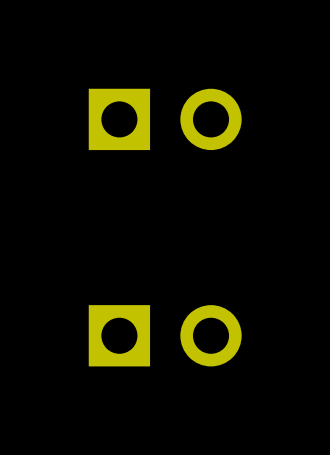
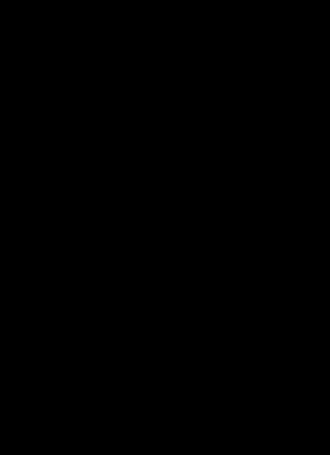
part: (165, 119) -> none
part: (165, 335) -> none

